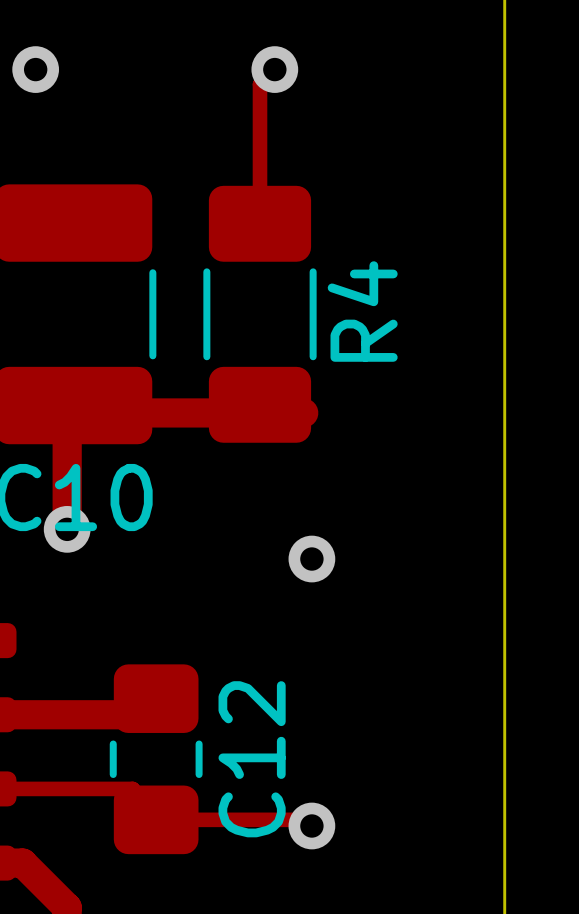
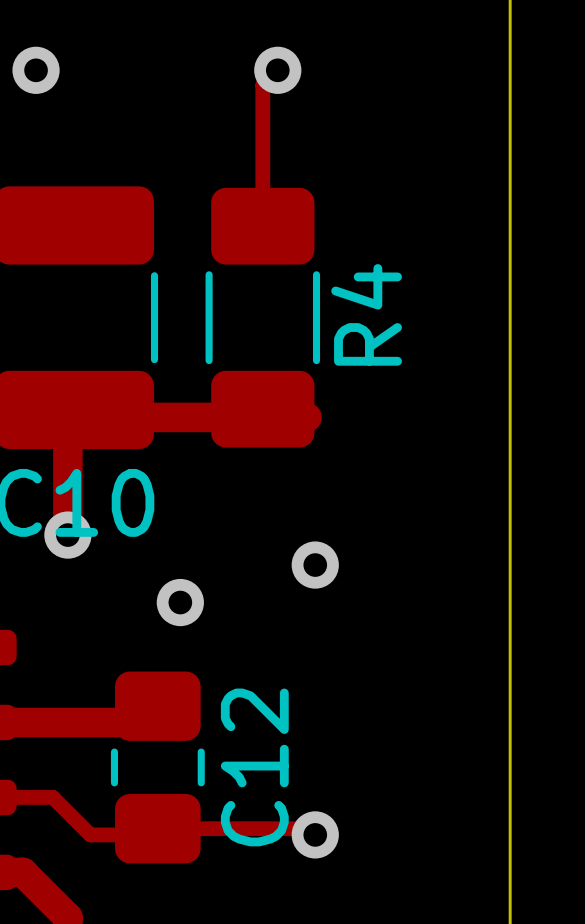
via: none -> (180, 602)
track: (52, 788) (132, 788) (156, 812) -> (52, 797) (90, 834) (151, 834)

